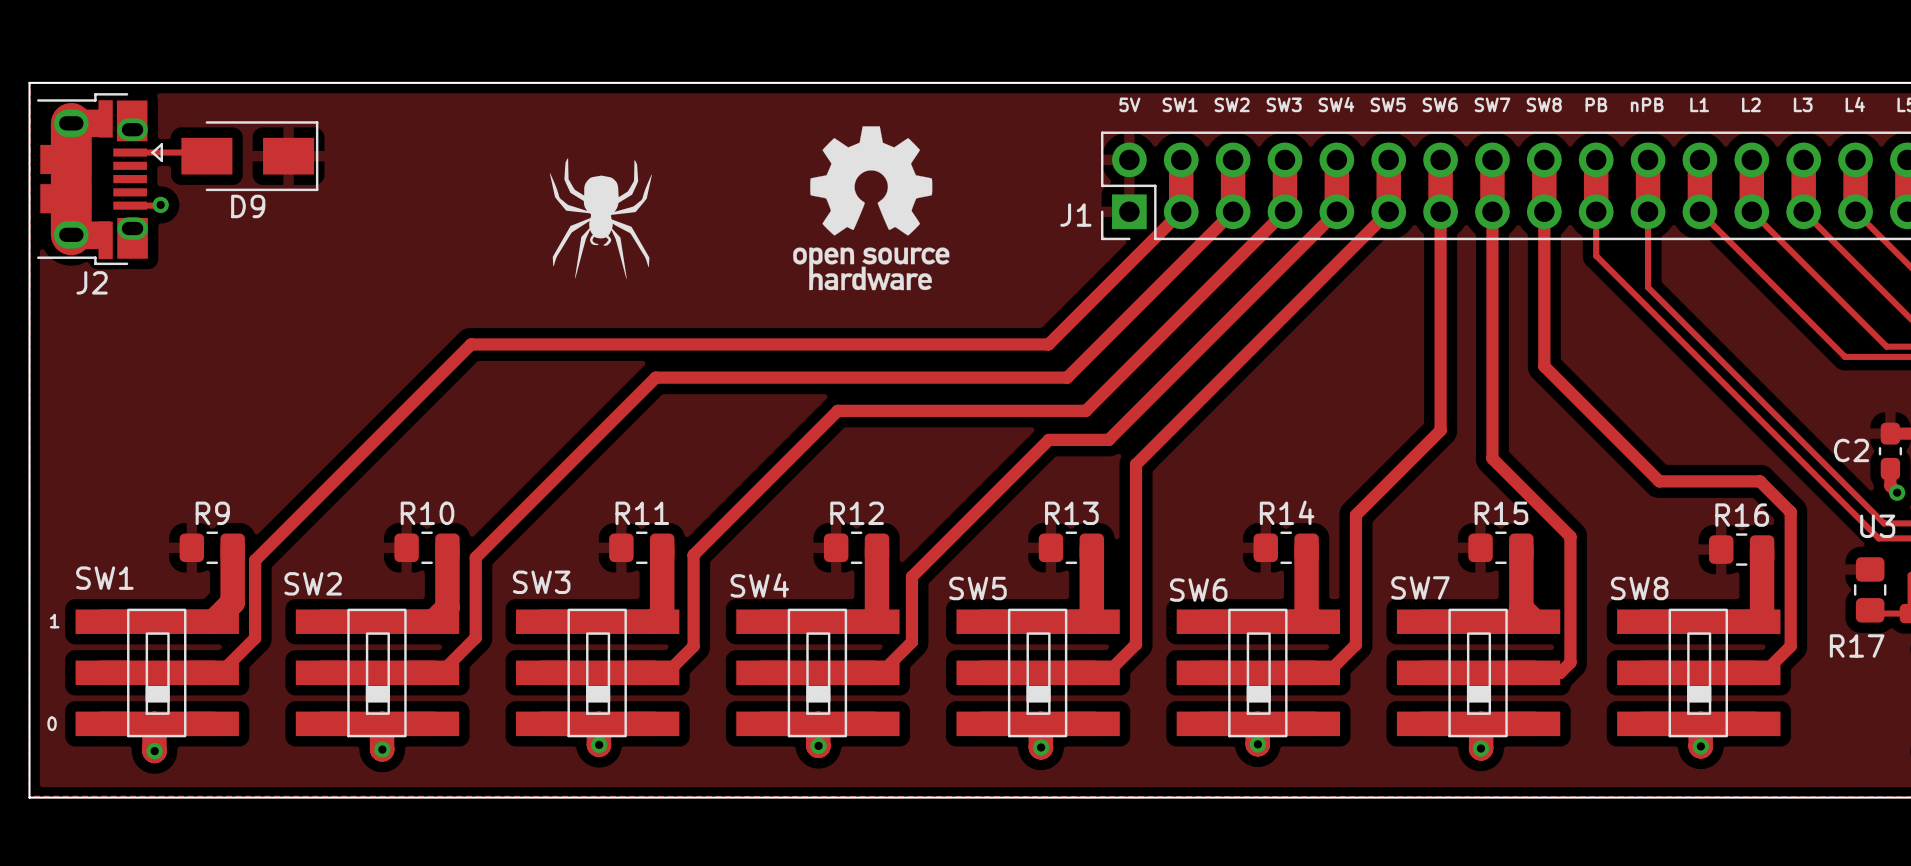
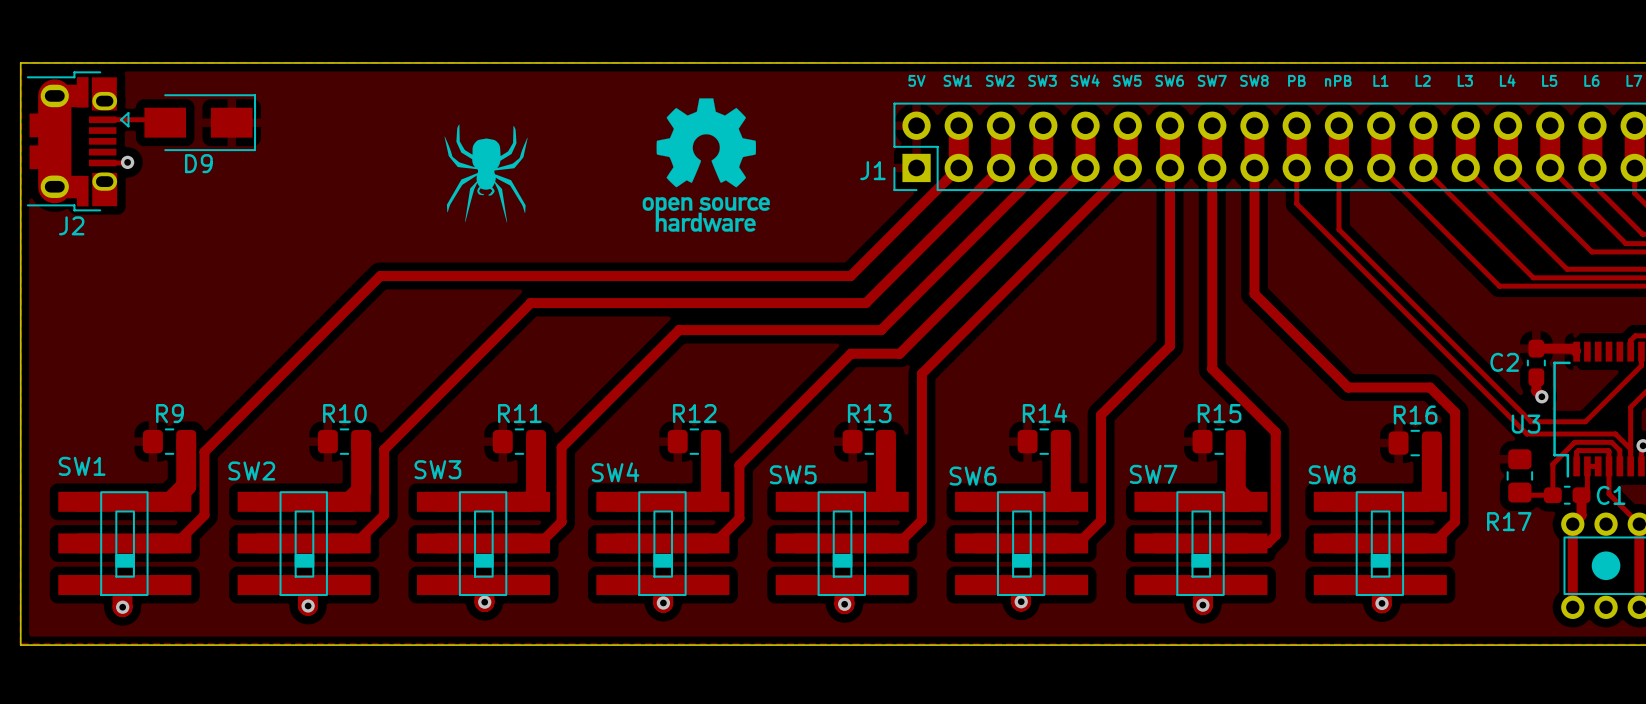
text: 1 (54, 621) -> none
text: 0 (52, 723) -> none

